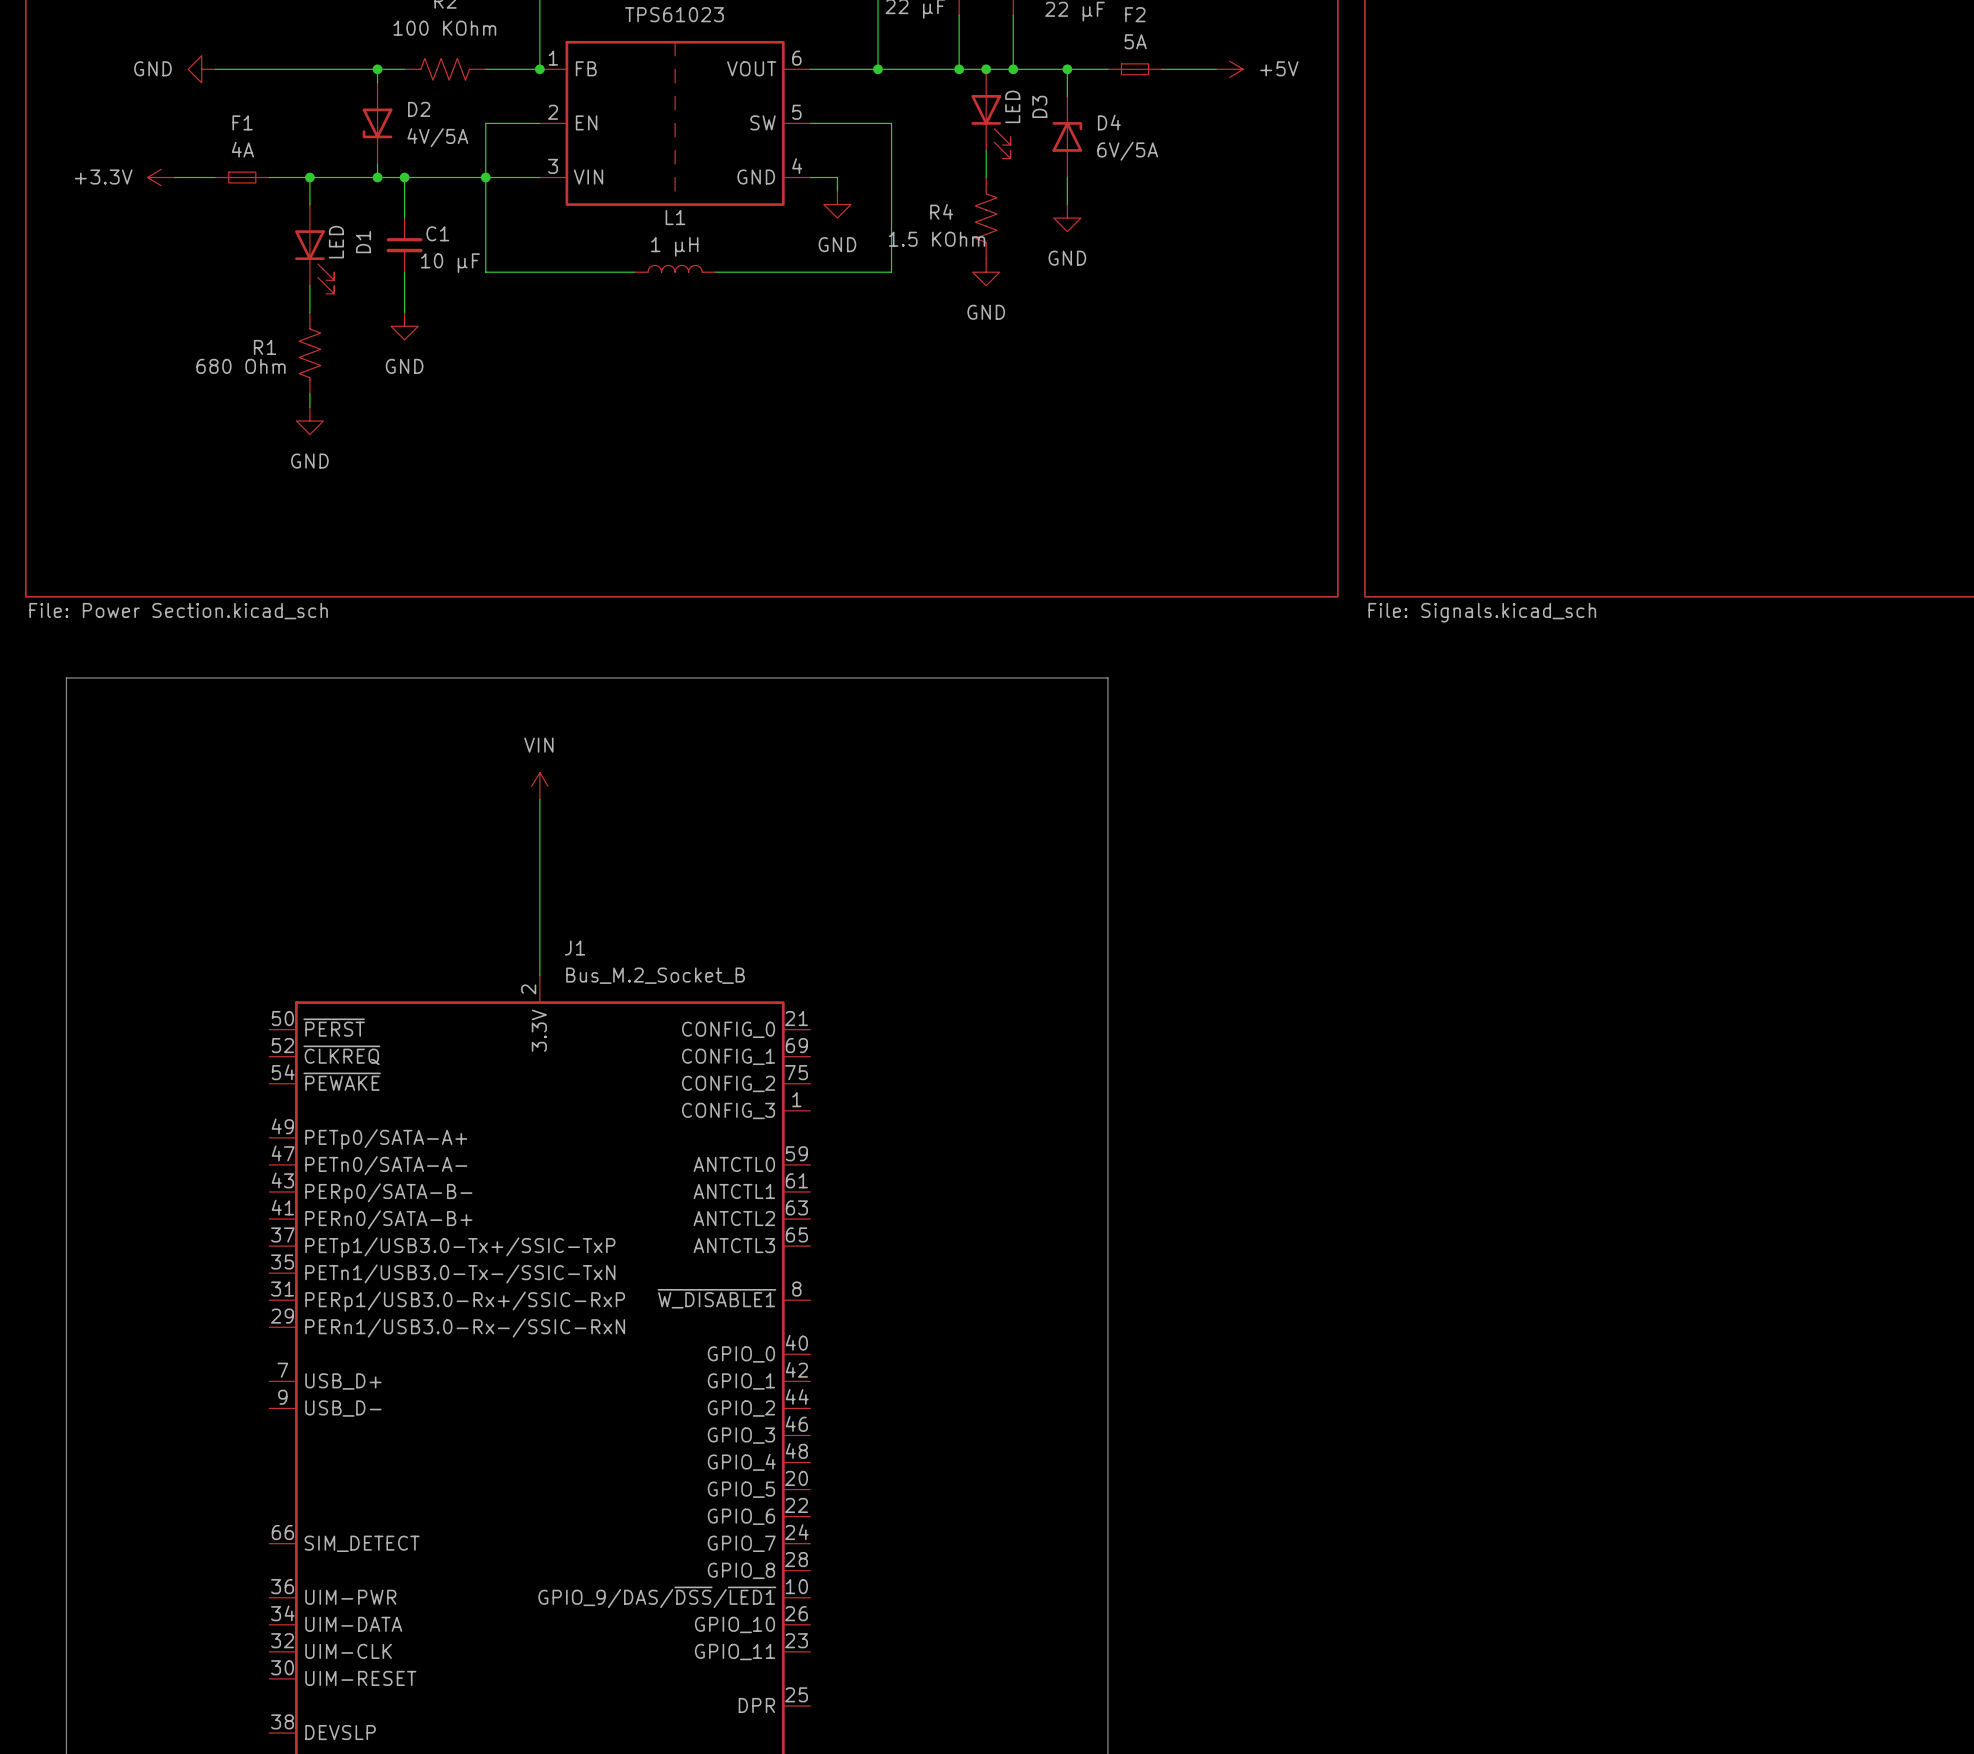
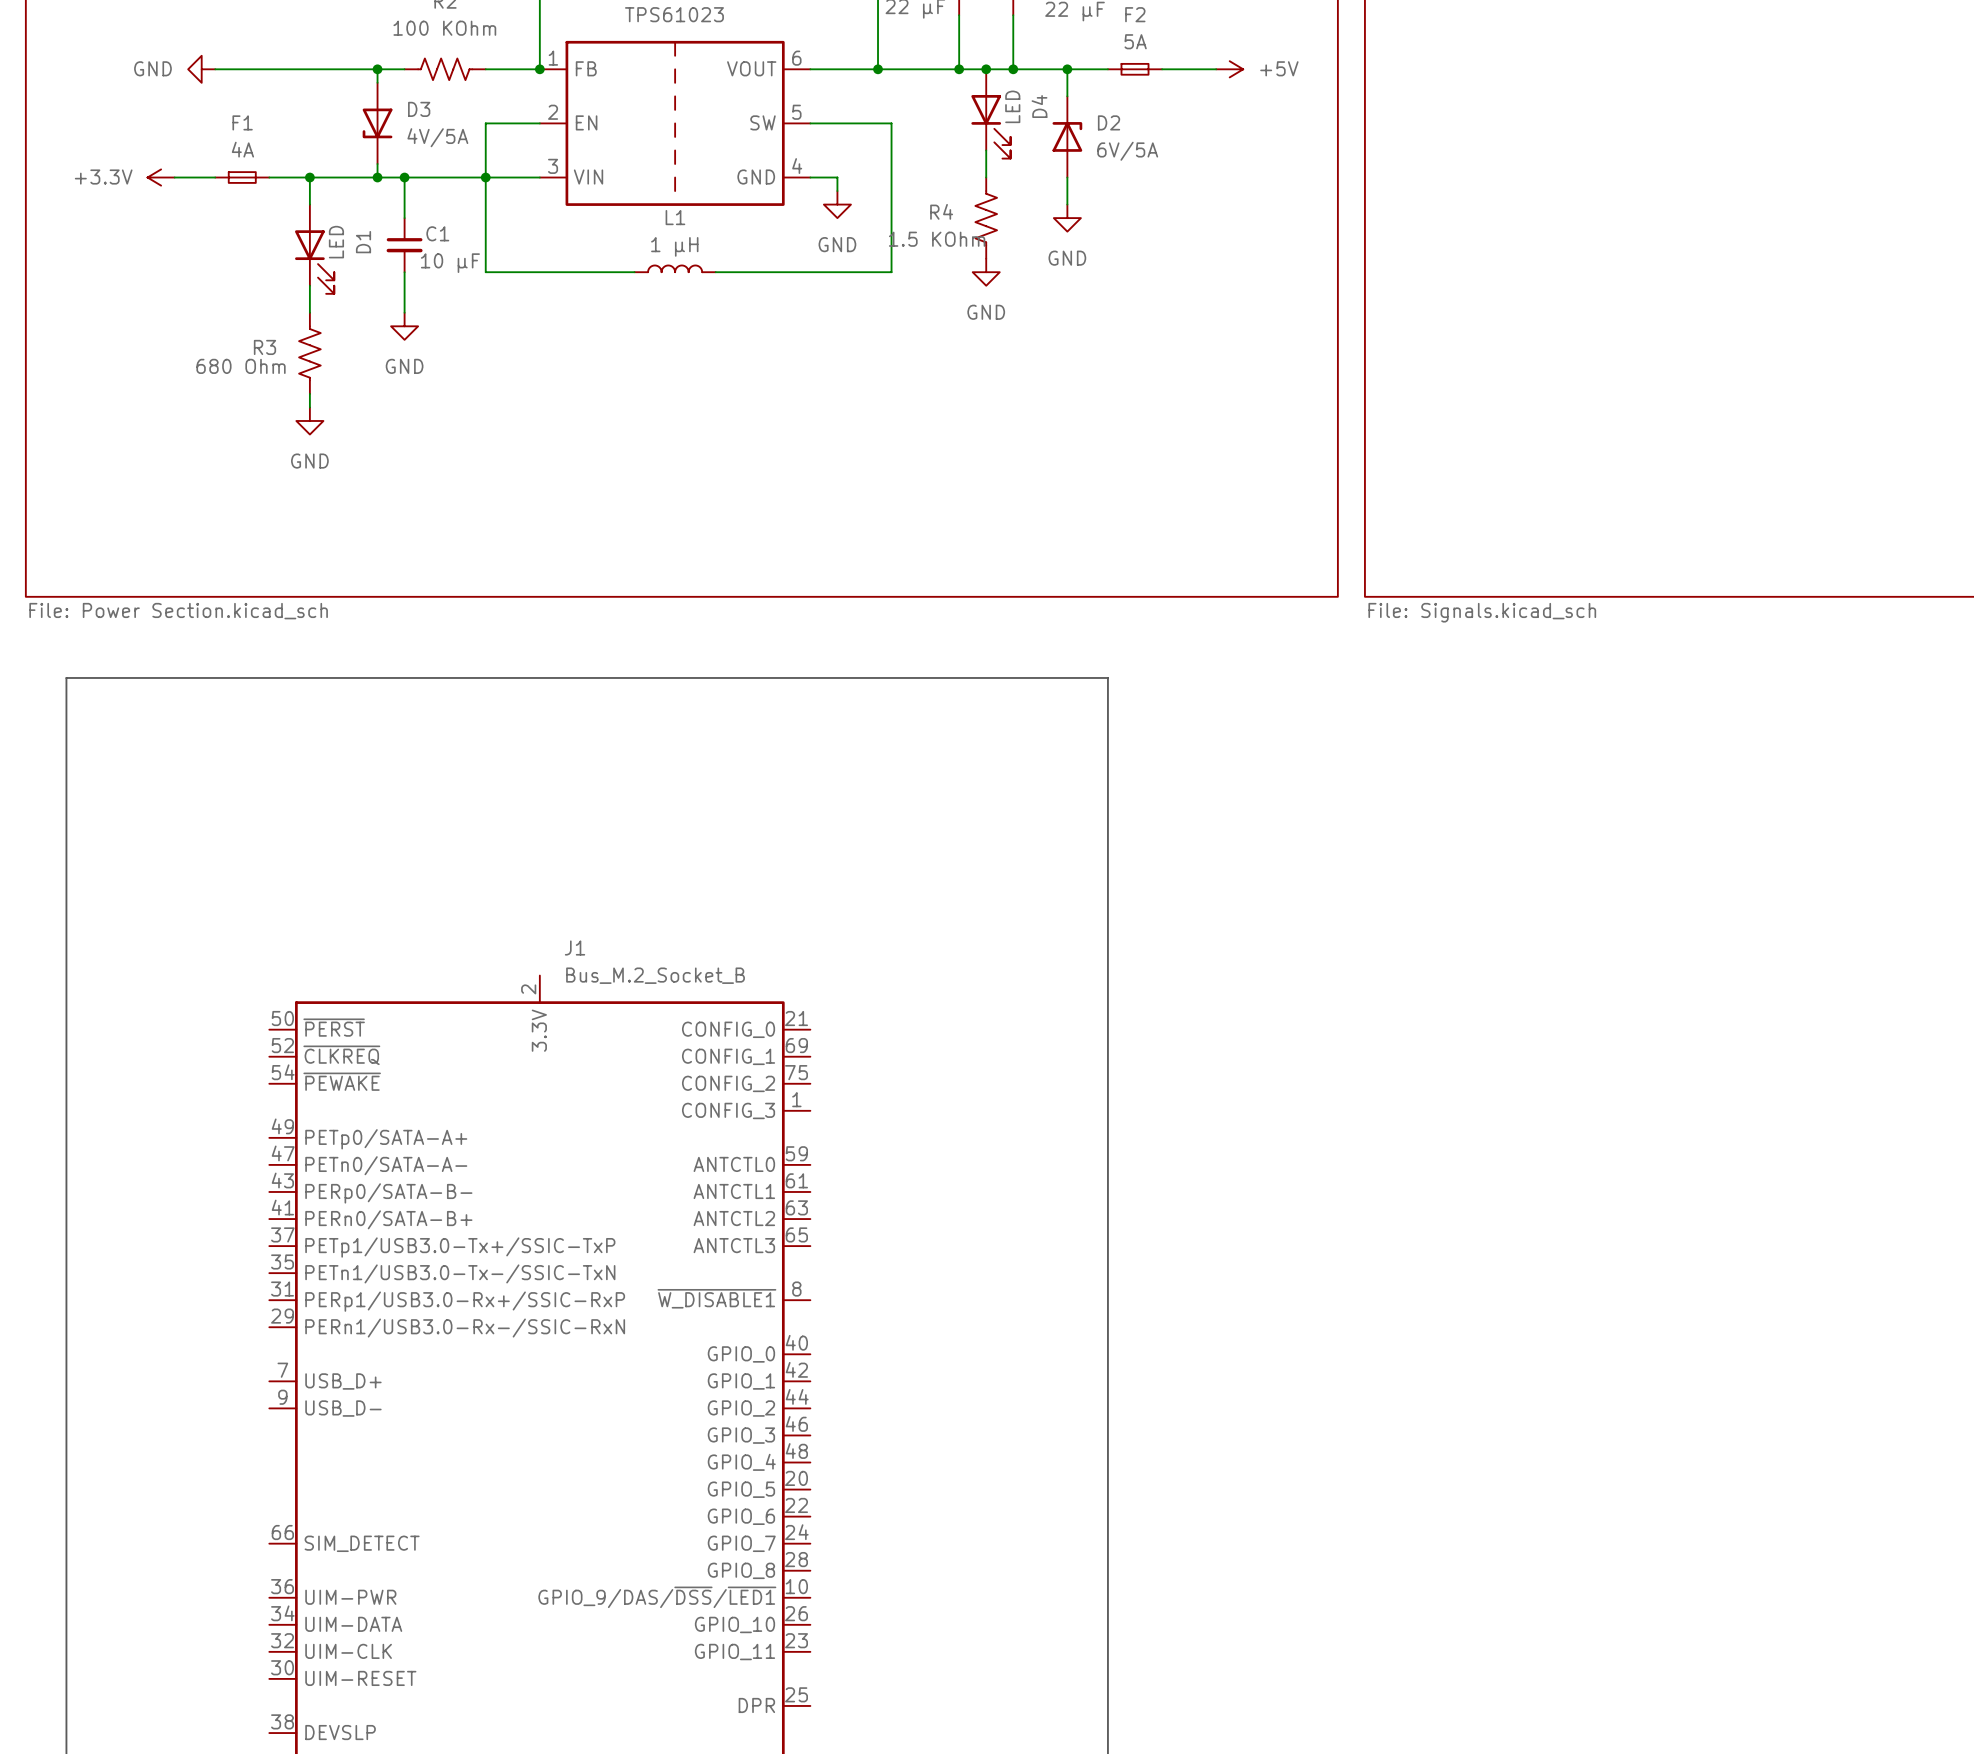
D3 name: D3 (1039, 106) -> D4 (1039, 106)
D2 name: D2 (419, 109) -> D3 (419, 109)
D4 name: D4 (1109, 122) -> D2 (1109, 122)
R1 name: R1 (264, 347) -> R3 (264, 347)
power symbol: VIN (539, 786) -> none
wire: (539, 799) (539, 975) -> none

